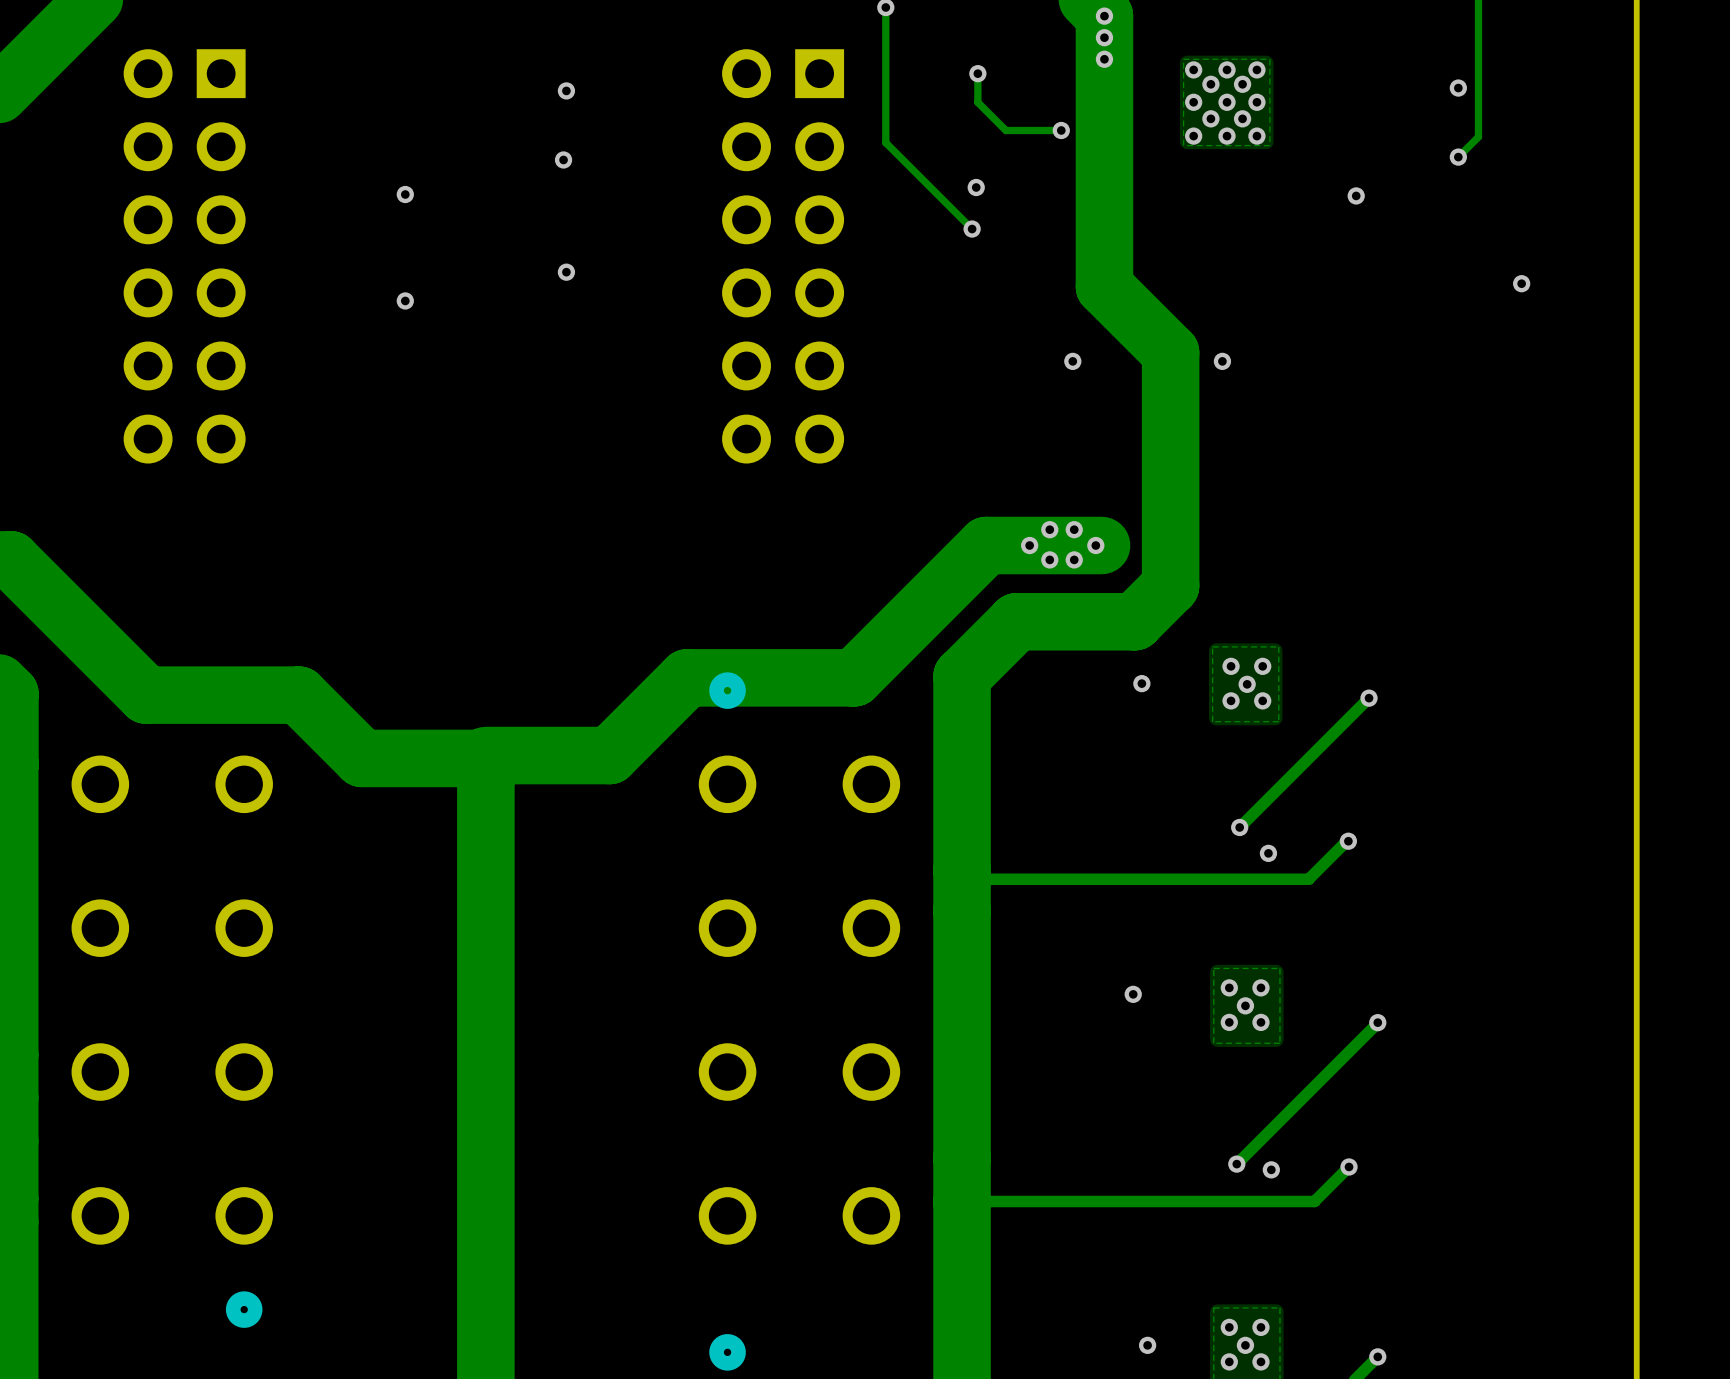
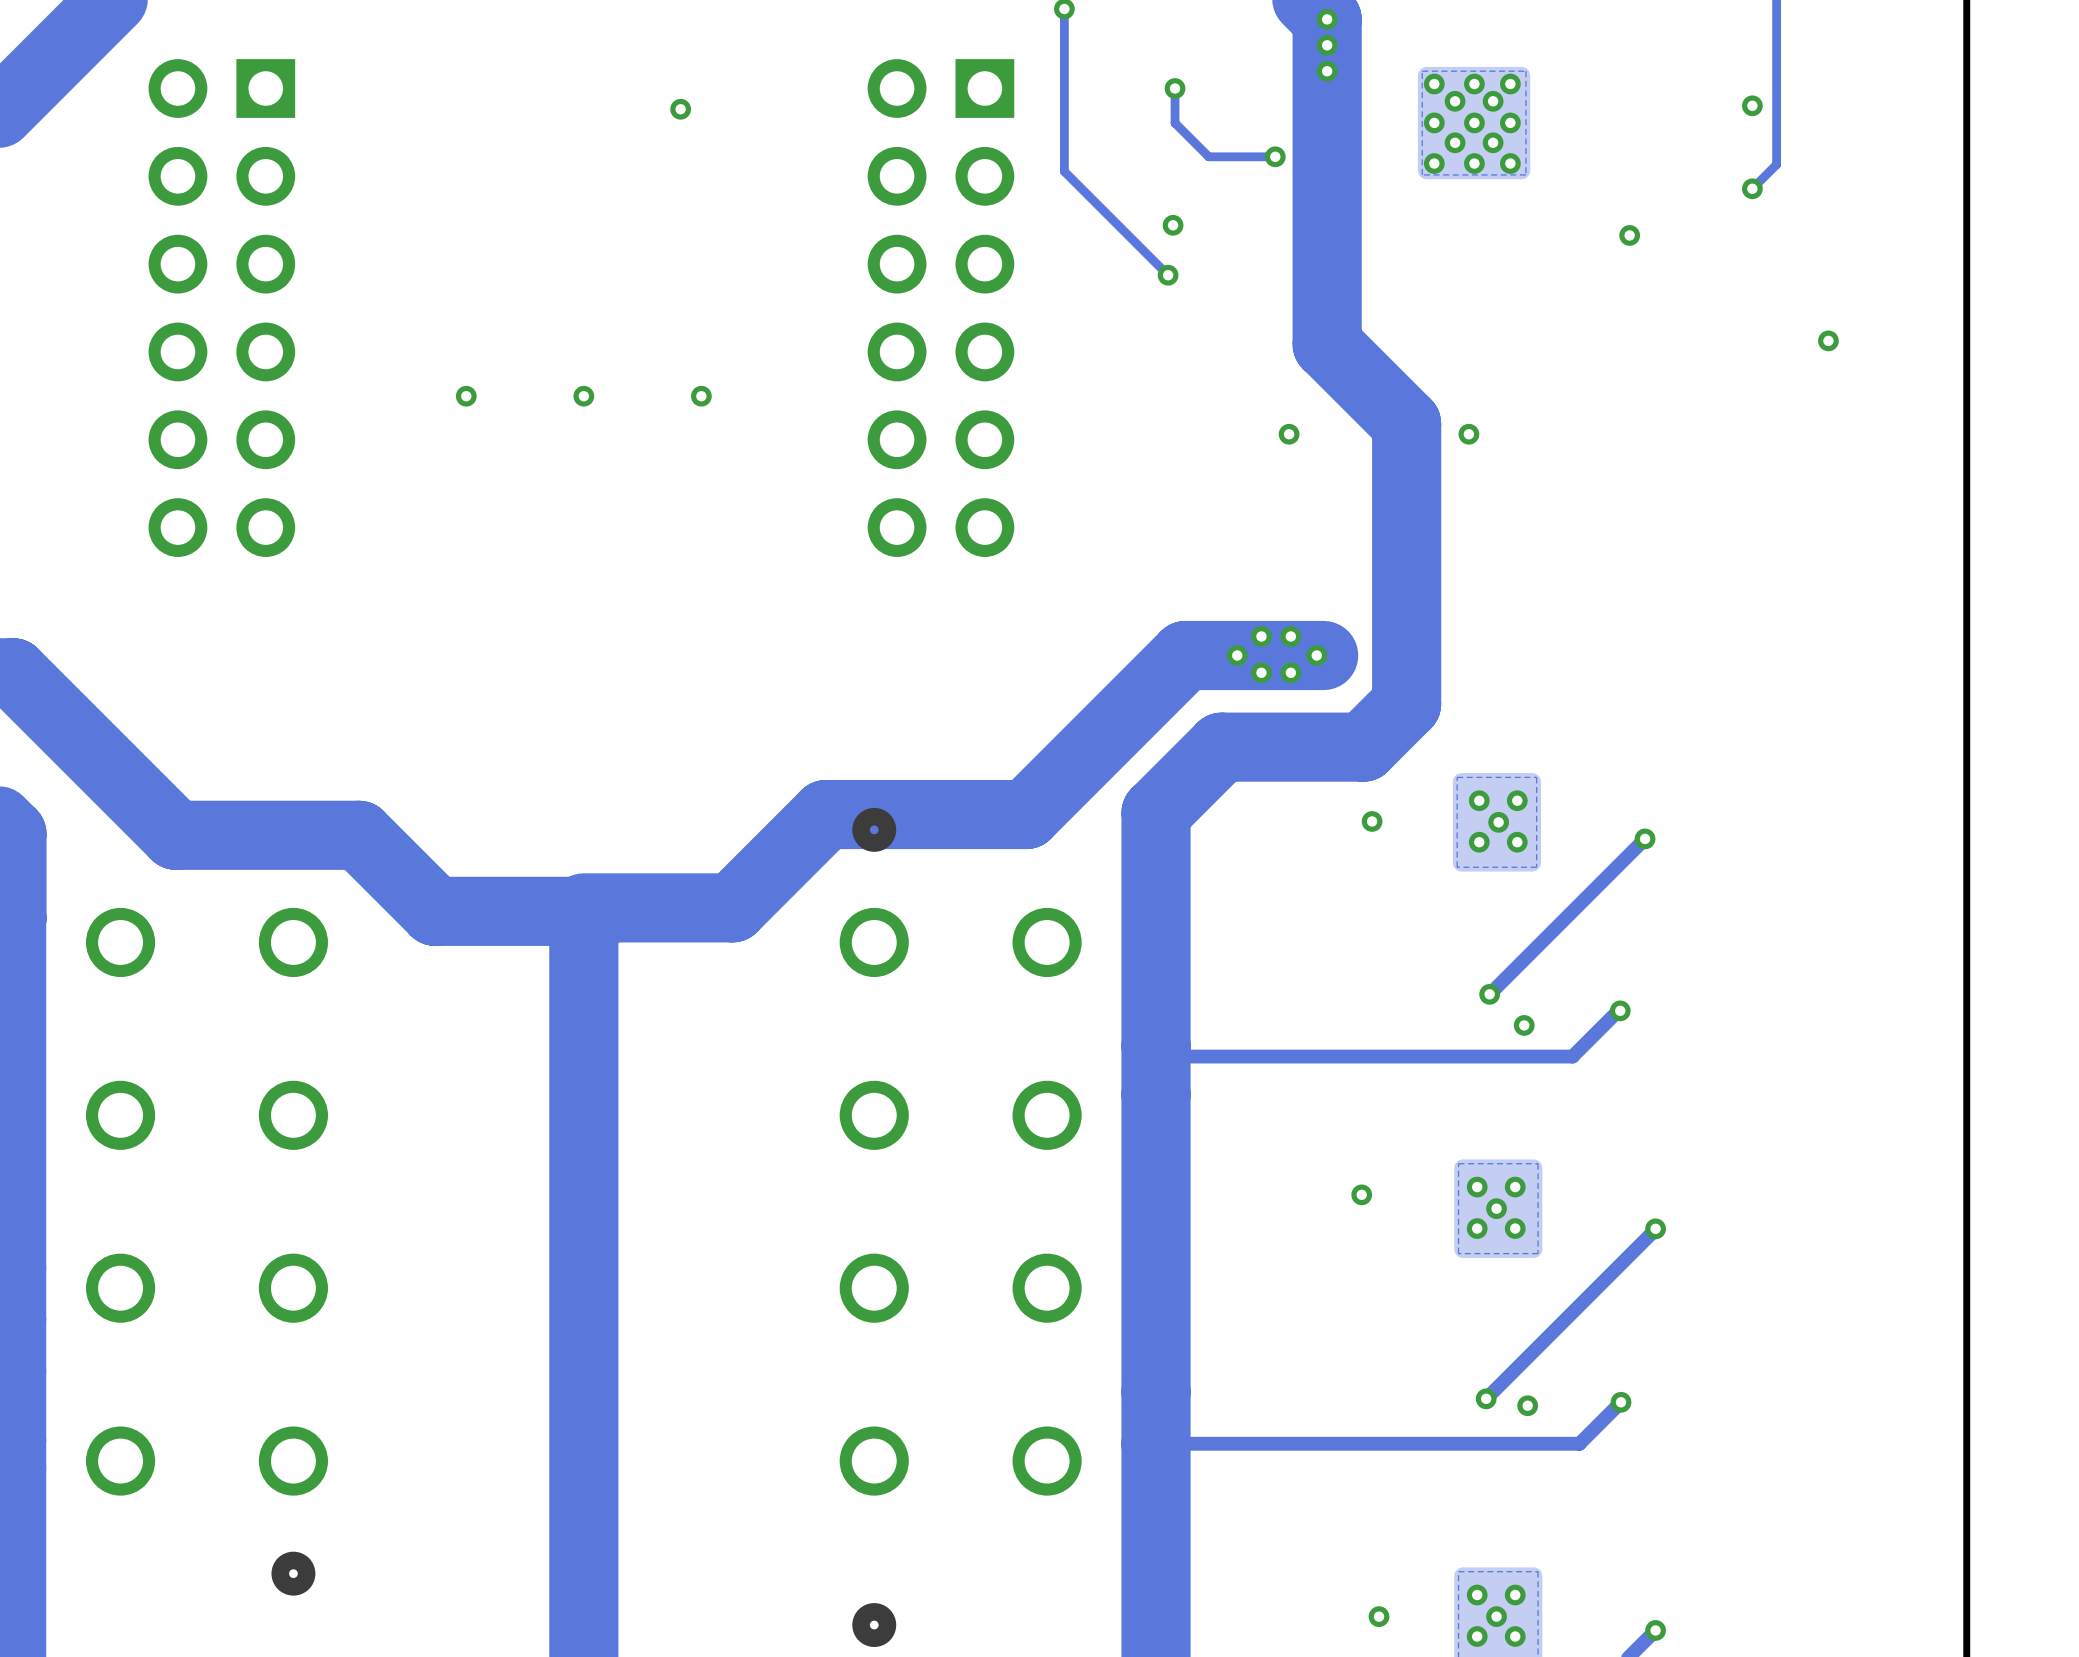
via: (563, 159) -> none
via: (405, 194) -> none
via: (566, 272) -> none
via position: (405, 300) -> (466, 396)
via: none -> (583, 396)
via: none -> (701, 396)

